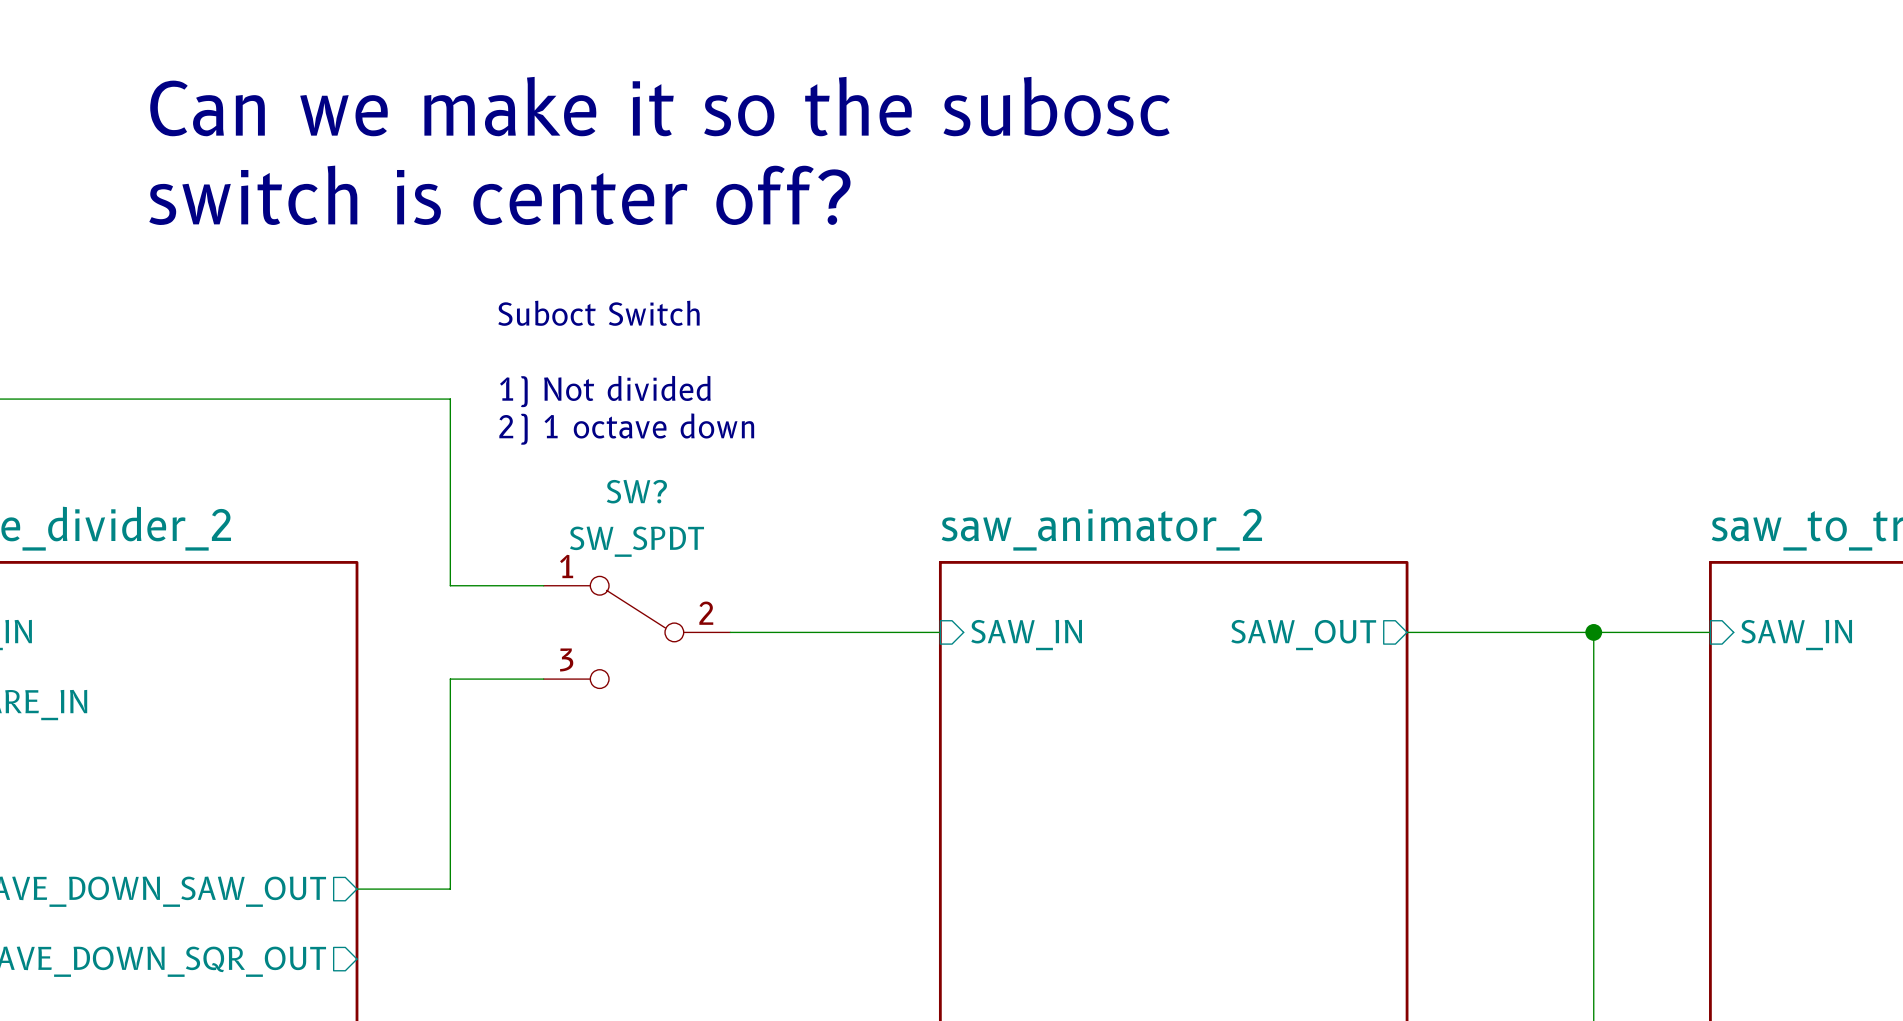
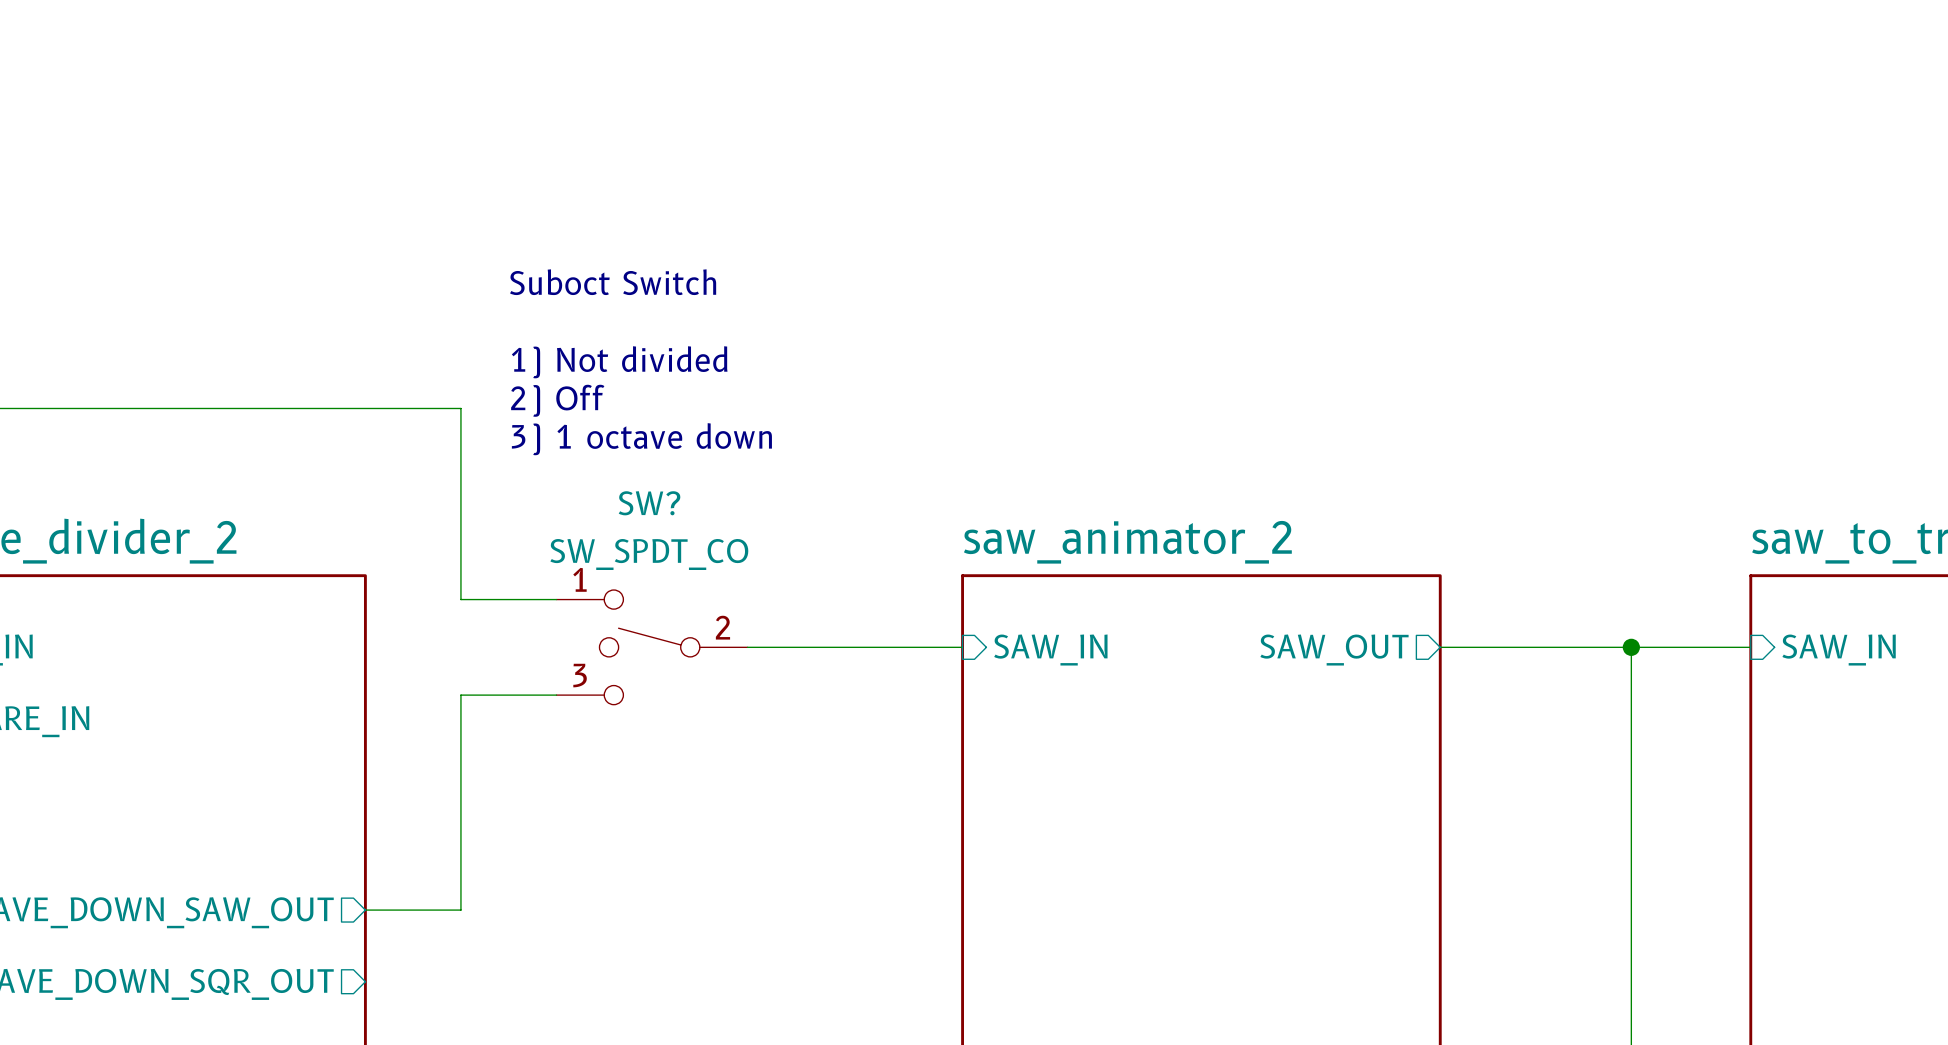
text: Can we make it so the subosc (660, 106) -> none
text: switch is center off? (499, 195) -> none
text position: Suboct Switch (598, 313) -> Suboct Switch (613, 282)
text: none -> 1) Not divided (619, 362)
text: 1) Not divided (605, 391) -> 2) Off (557, 400)
text: 2) 1 octave down (626, 429) -> 3) 1 octave down (641, 439)
SW? value: SW_SPDT (636, 541) -> SW_SPDT_CO (649, 554)
SW? symbol: [543, 576, 731, 689] -> [556, 590, 748, 705]

